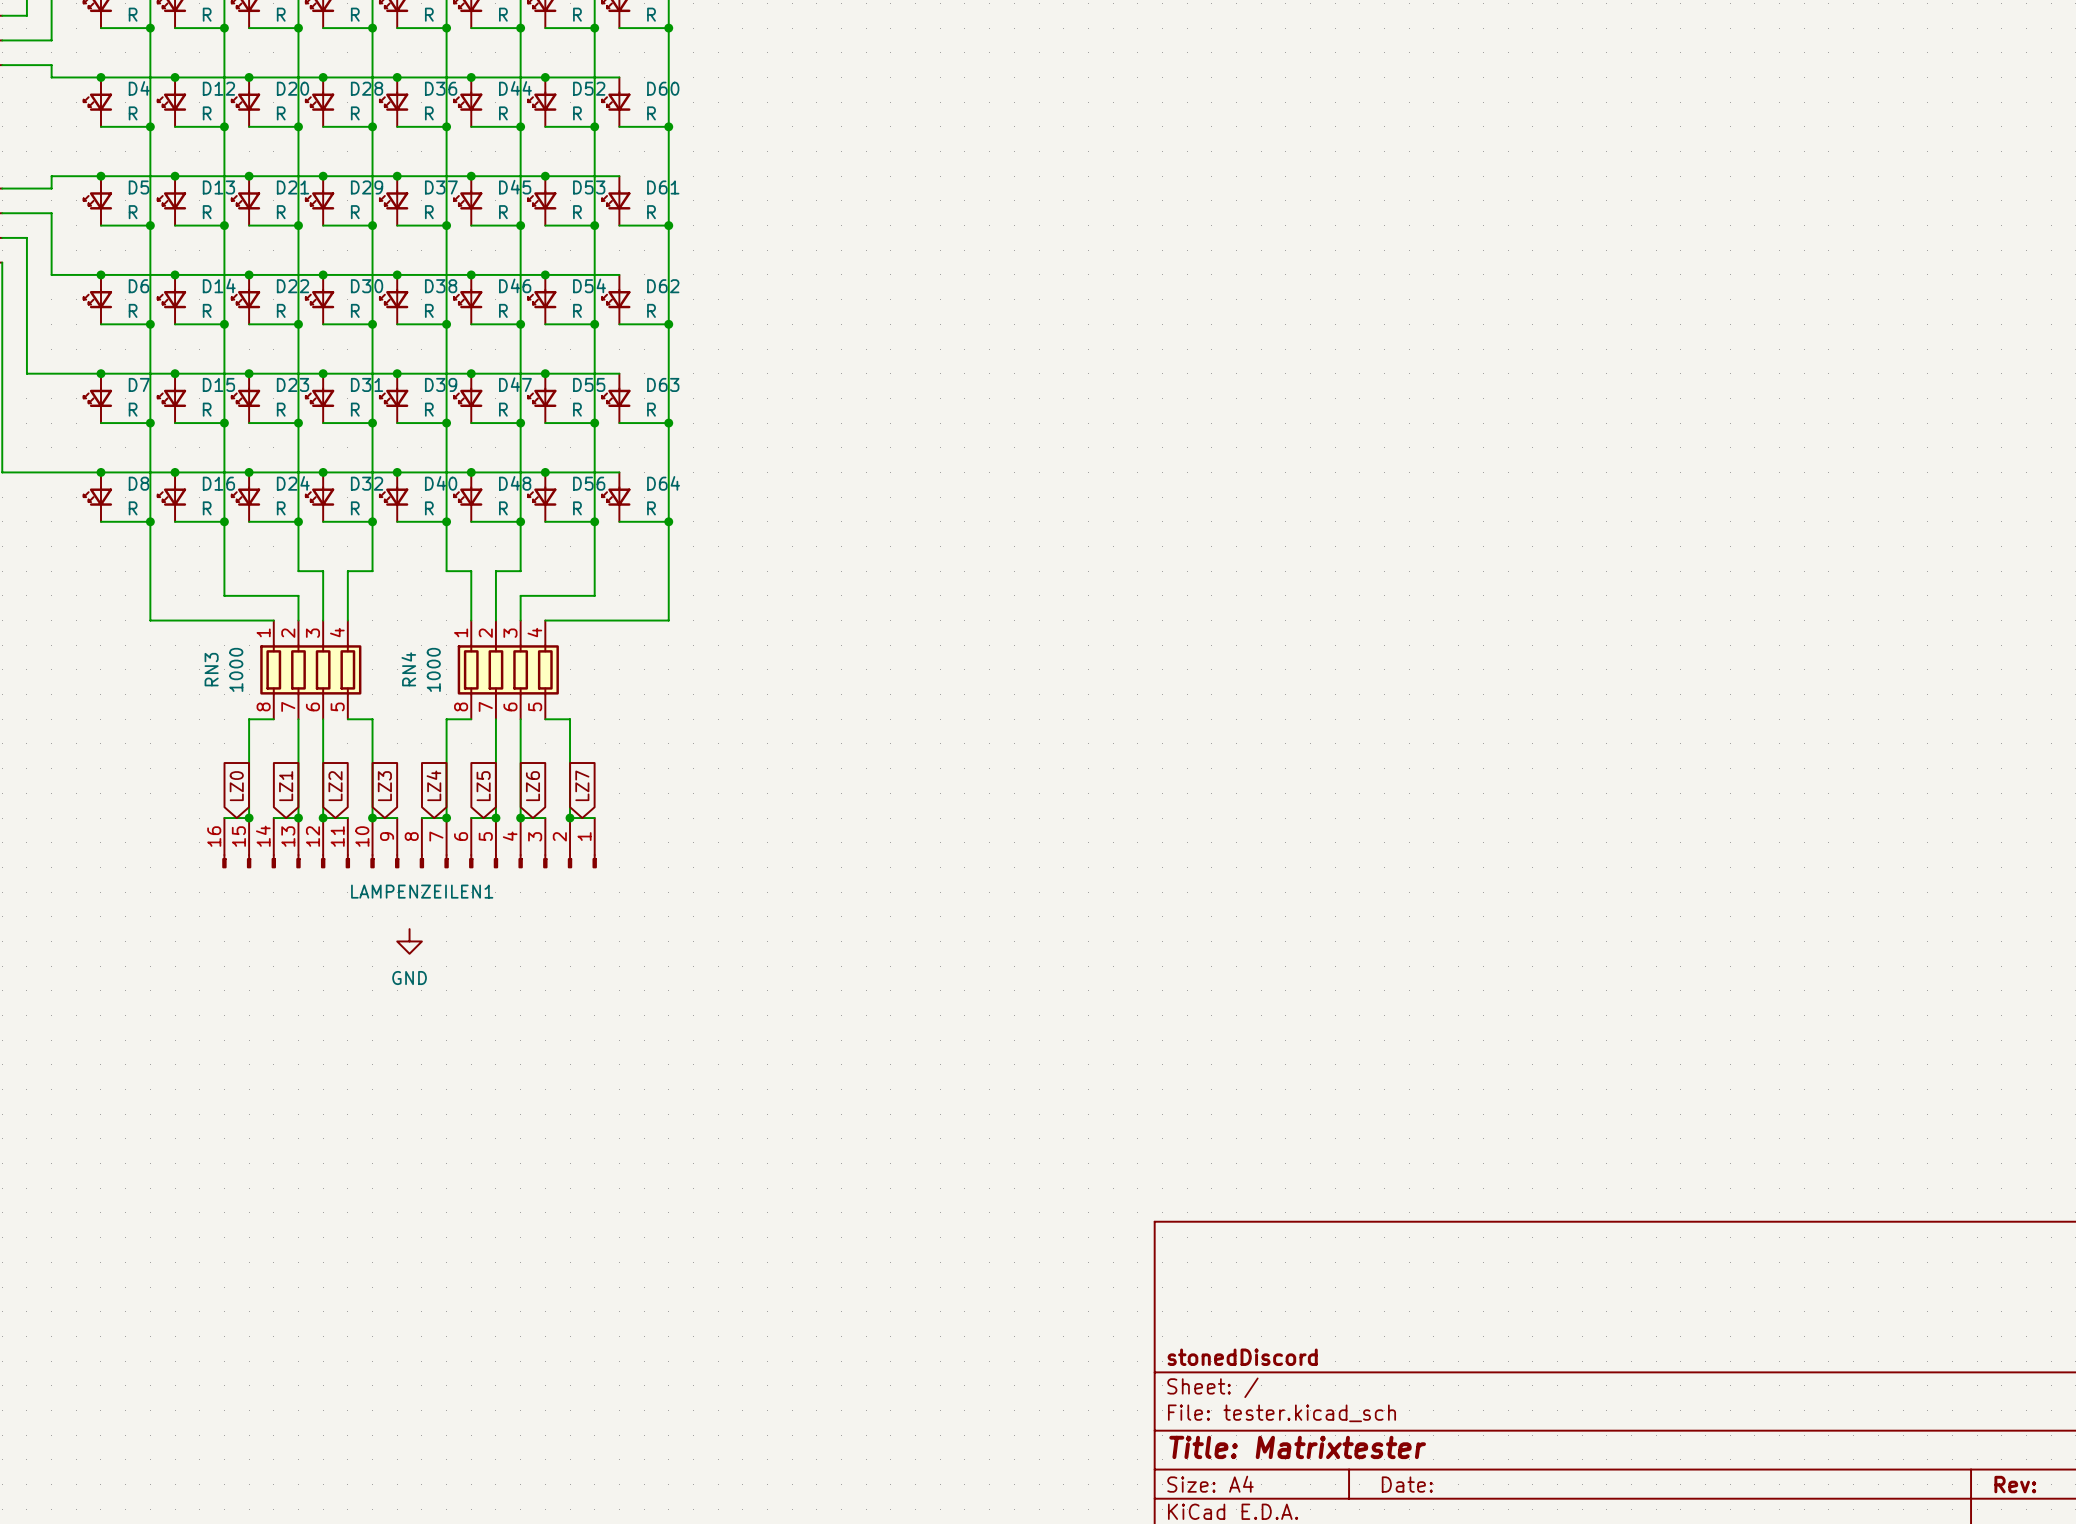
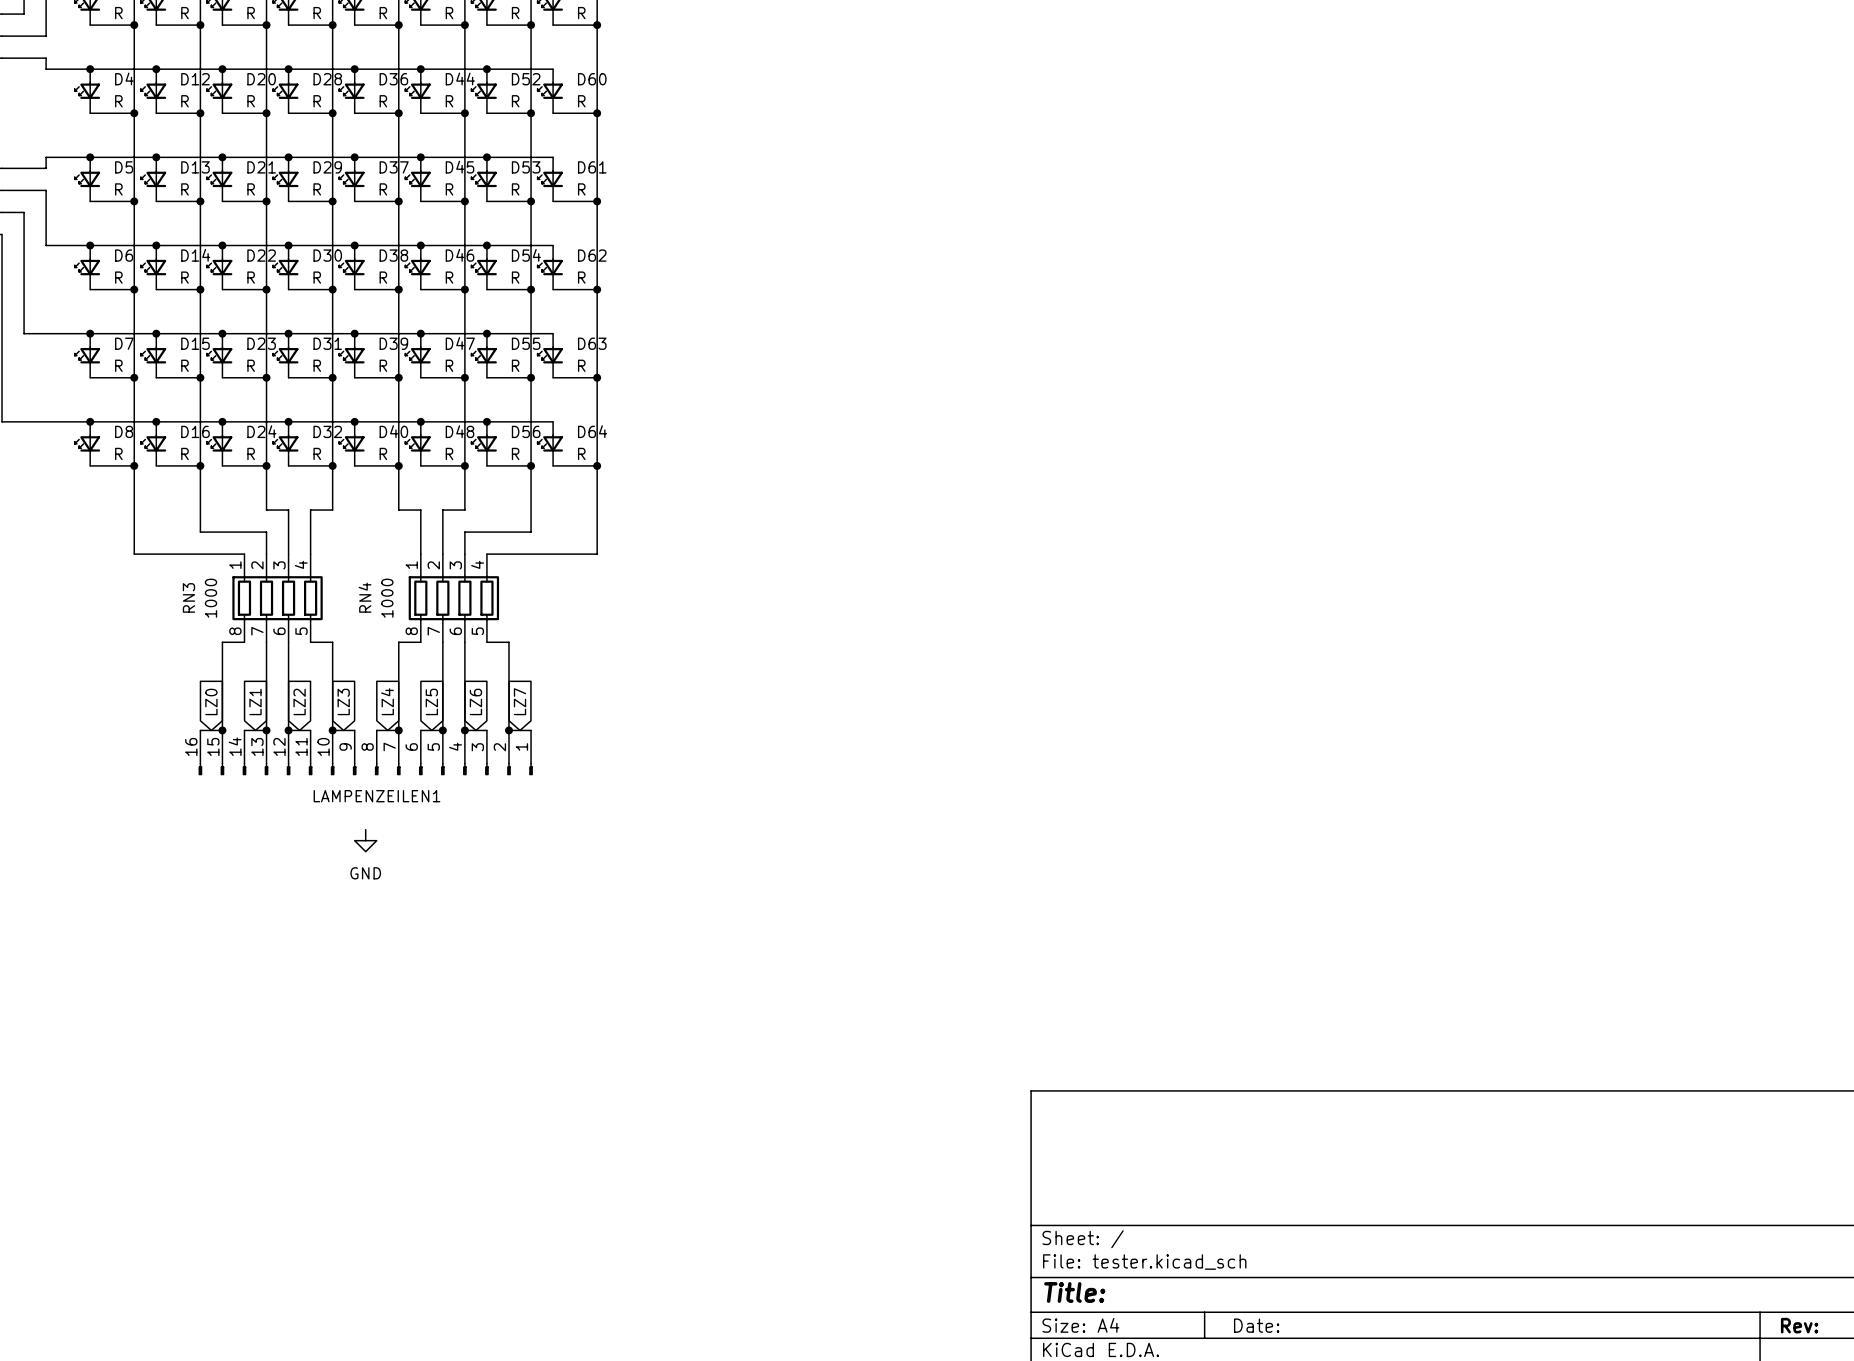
title block: stonedDiscord (1242, 1357) -> none
title block: Title: Matrixtester (1297, 1447) -> Title: (1074, 1292)

